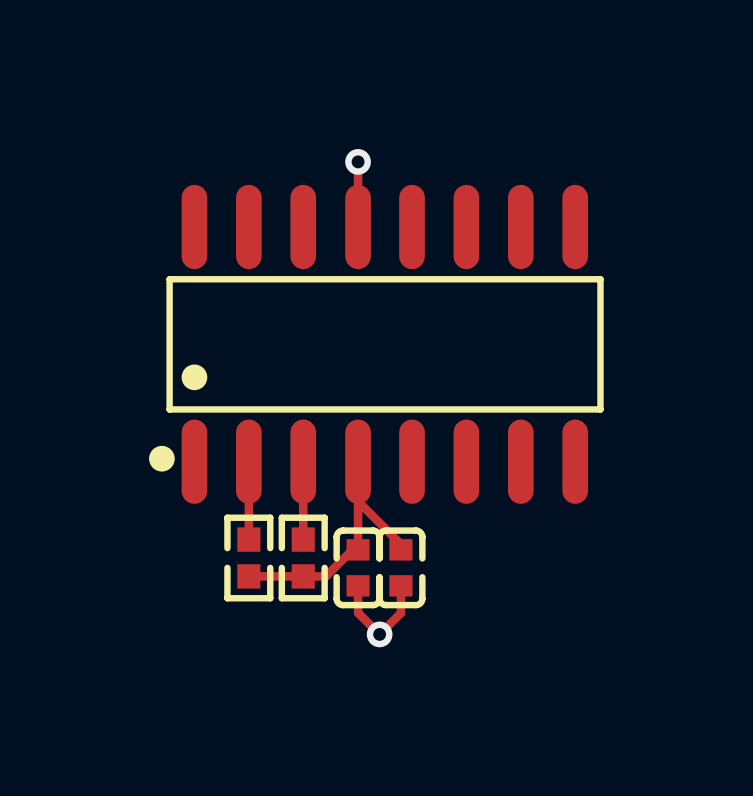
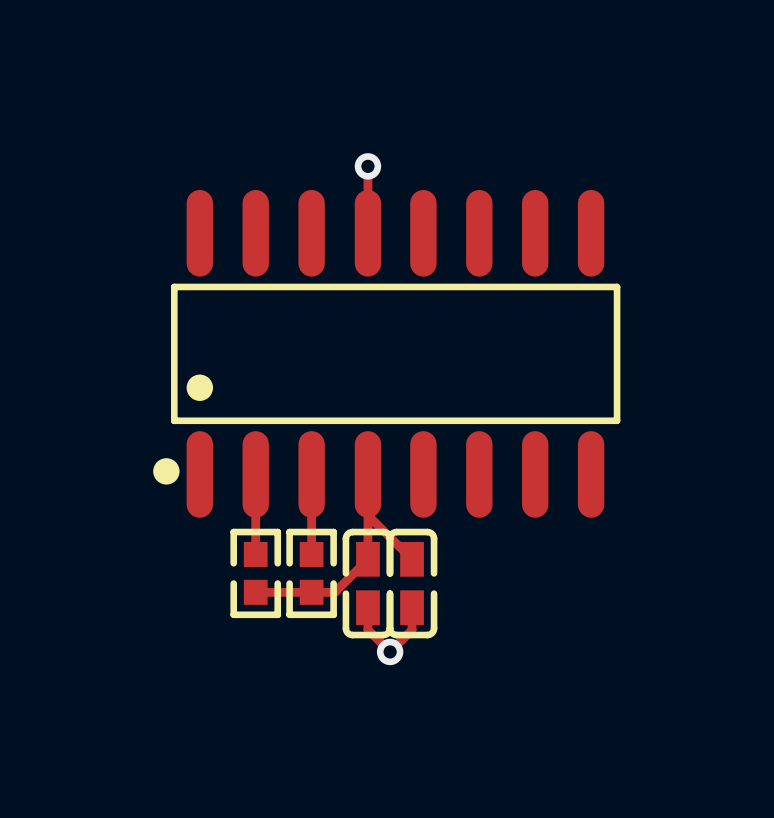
part footprint: [333, 527, 383, 609] -> [342, 528, 394, 639]
part footprint: [376, 527, 426, 609] -> [386, 528, 438, 639]

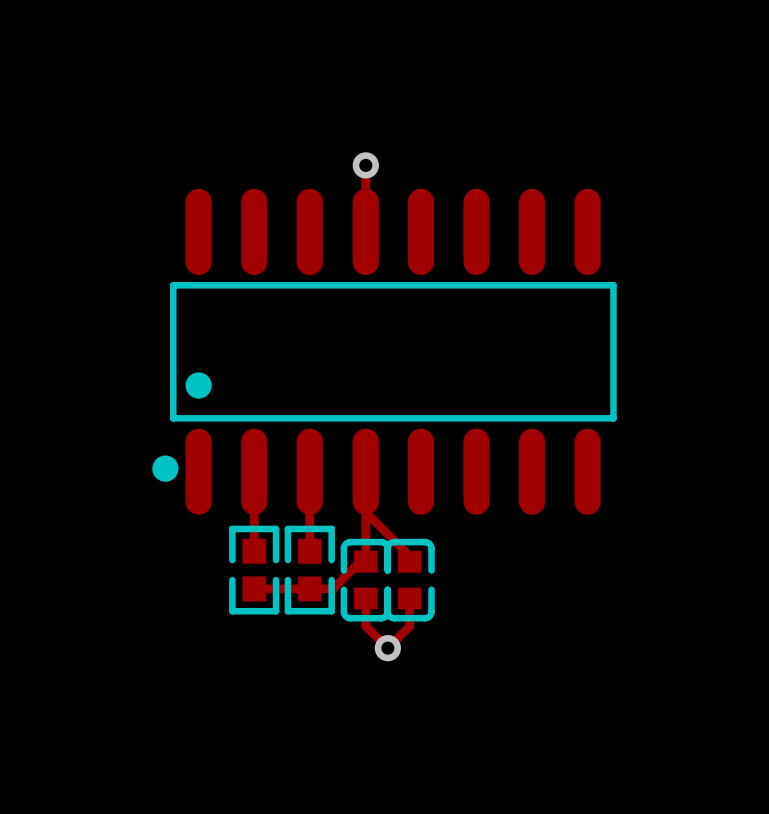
part footprint: [342, 528, 394, 639] -> [340, 538, 391, 622]
part footprint: [386, 528, 438, 639] -> [384, 538, 435, 622]

